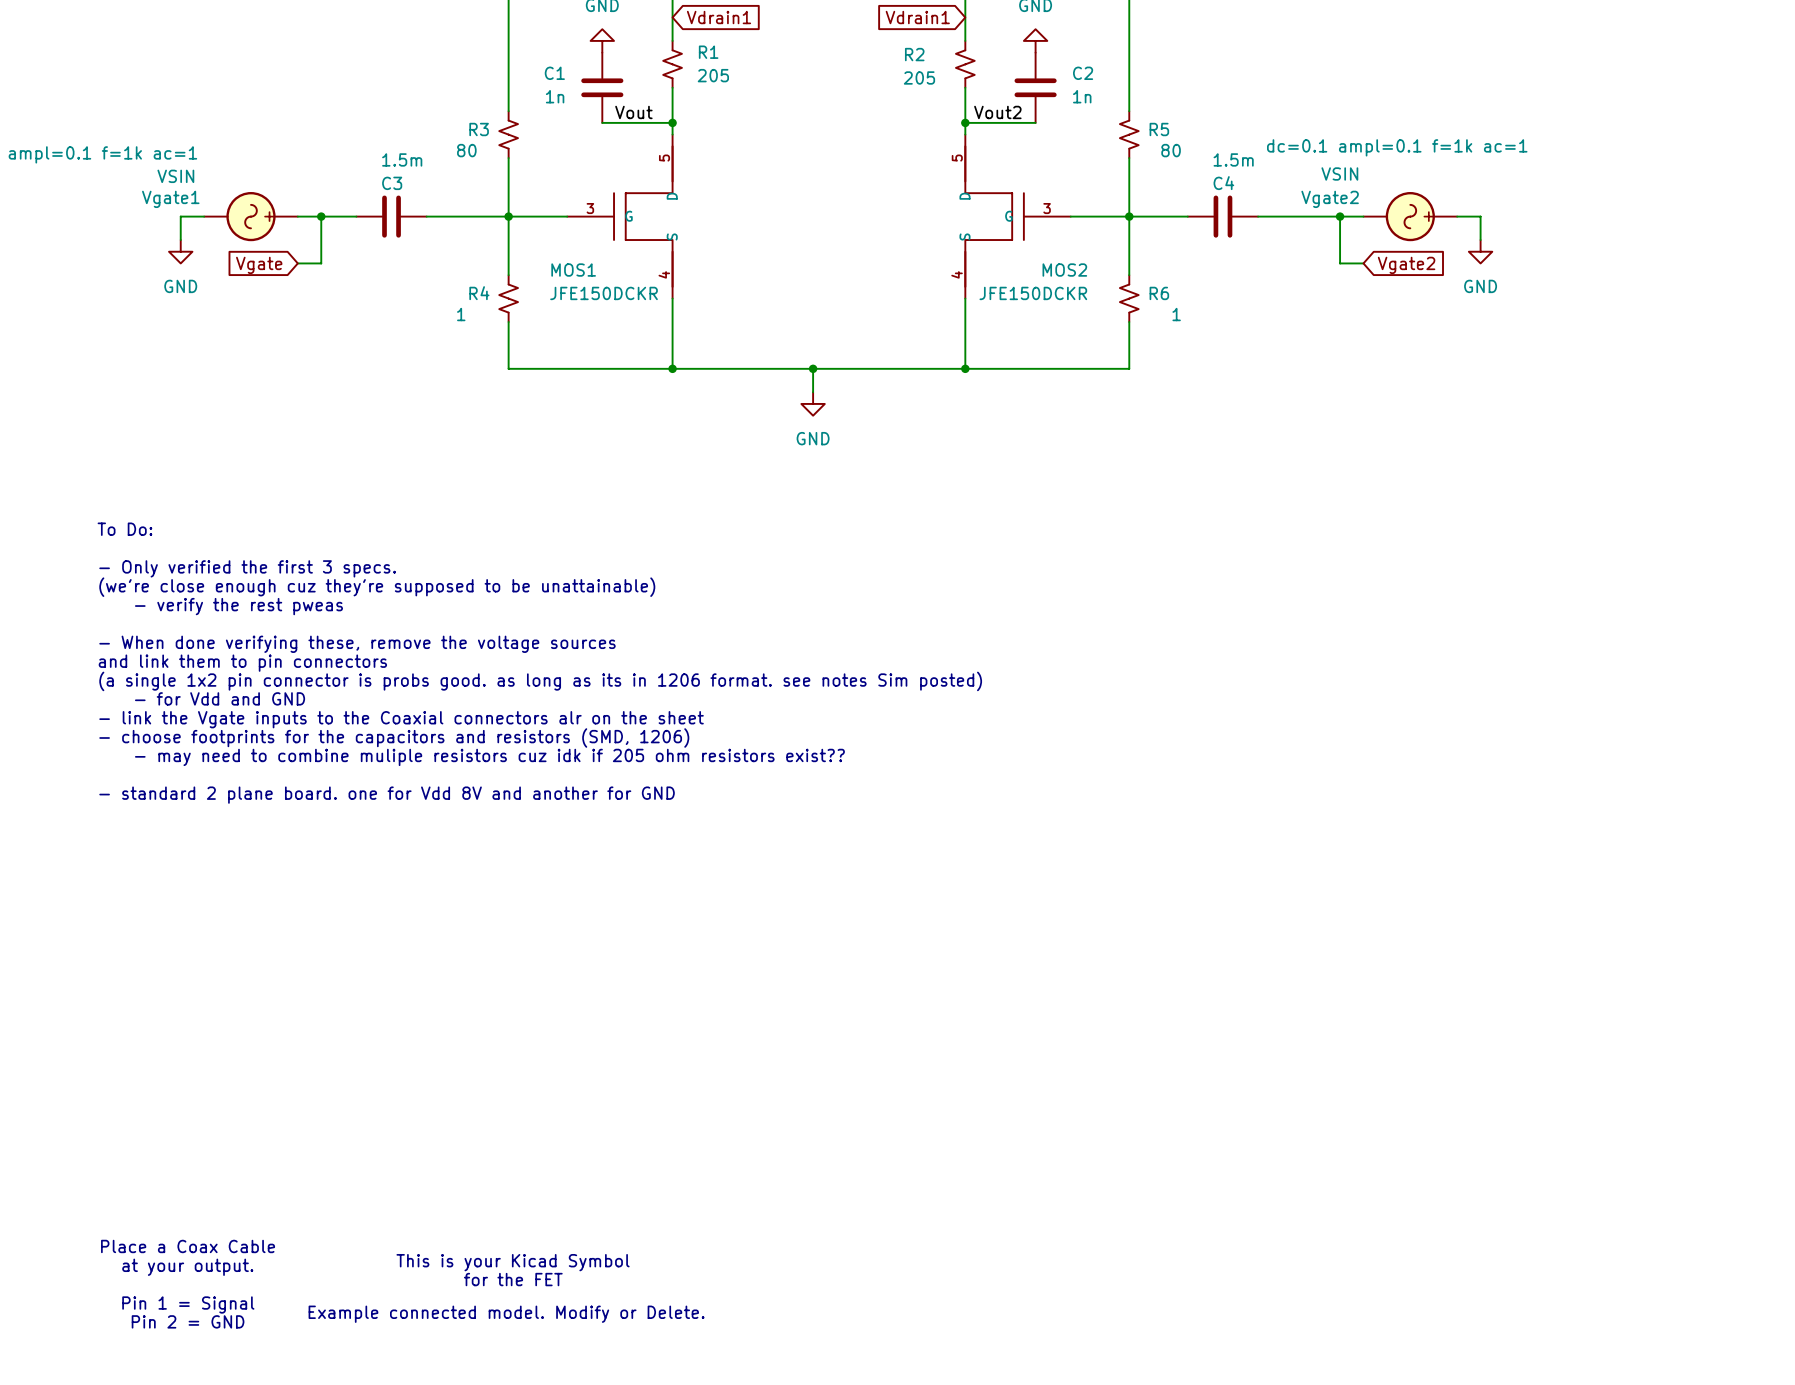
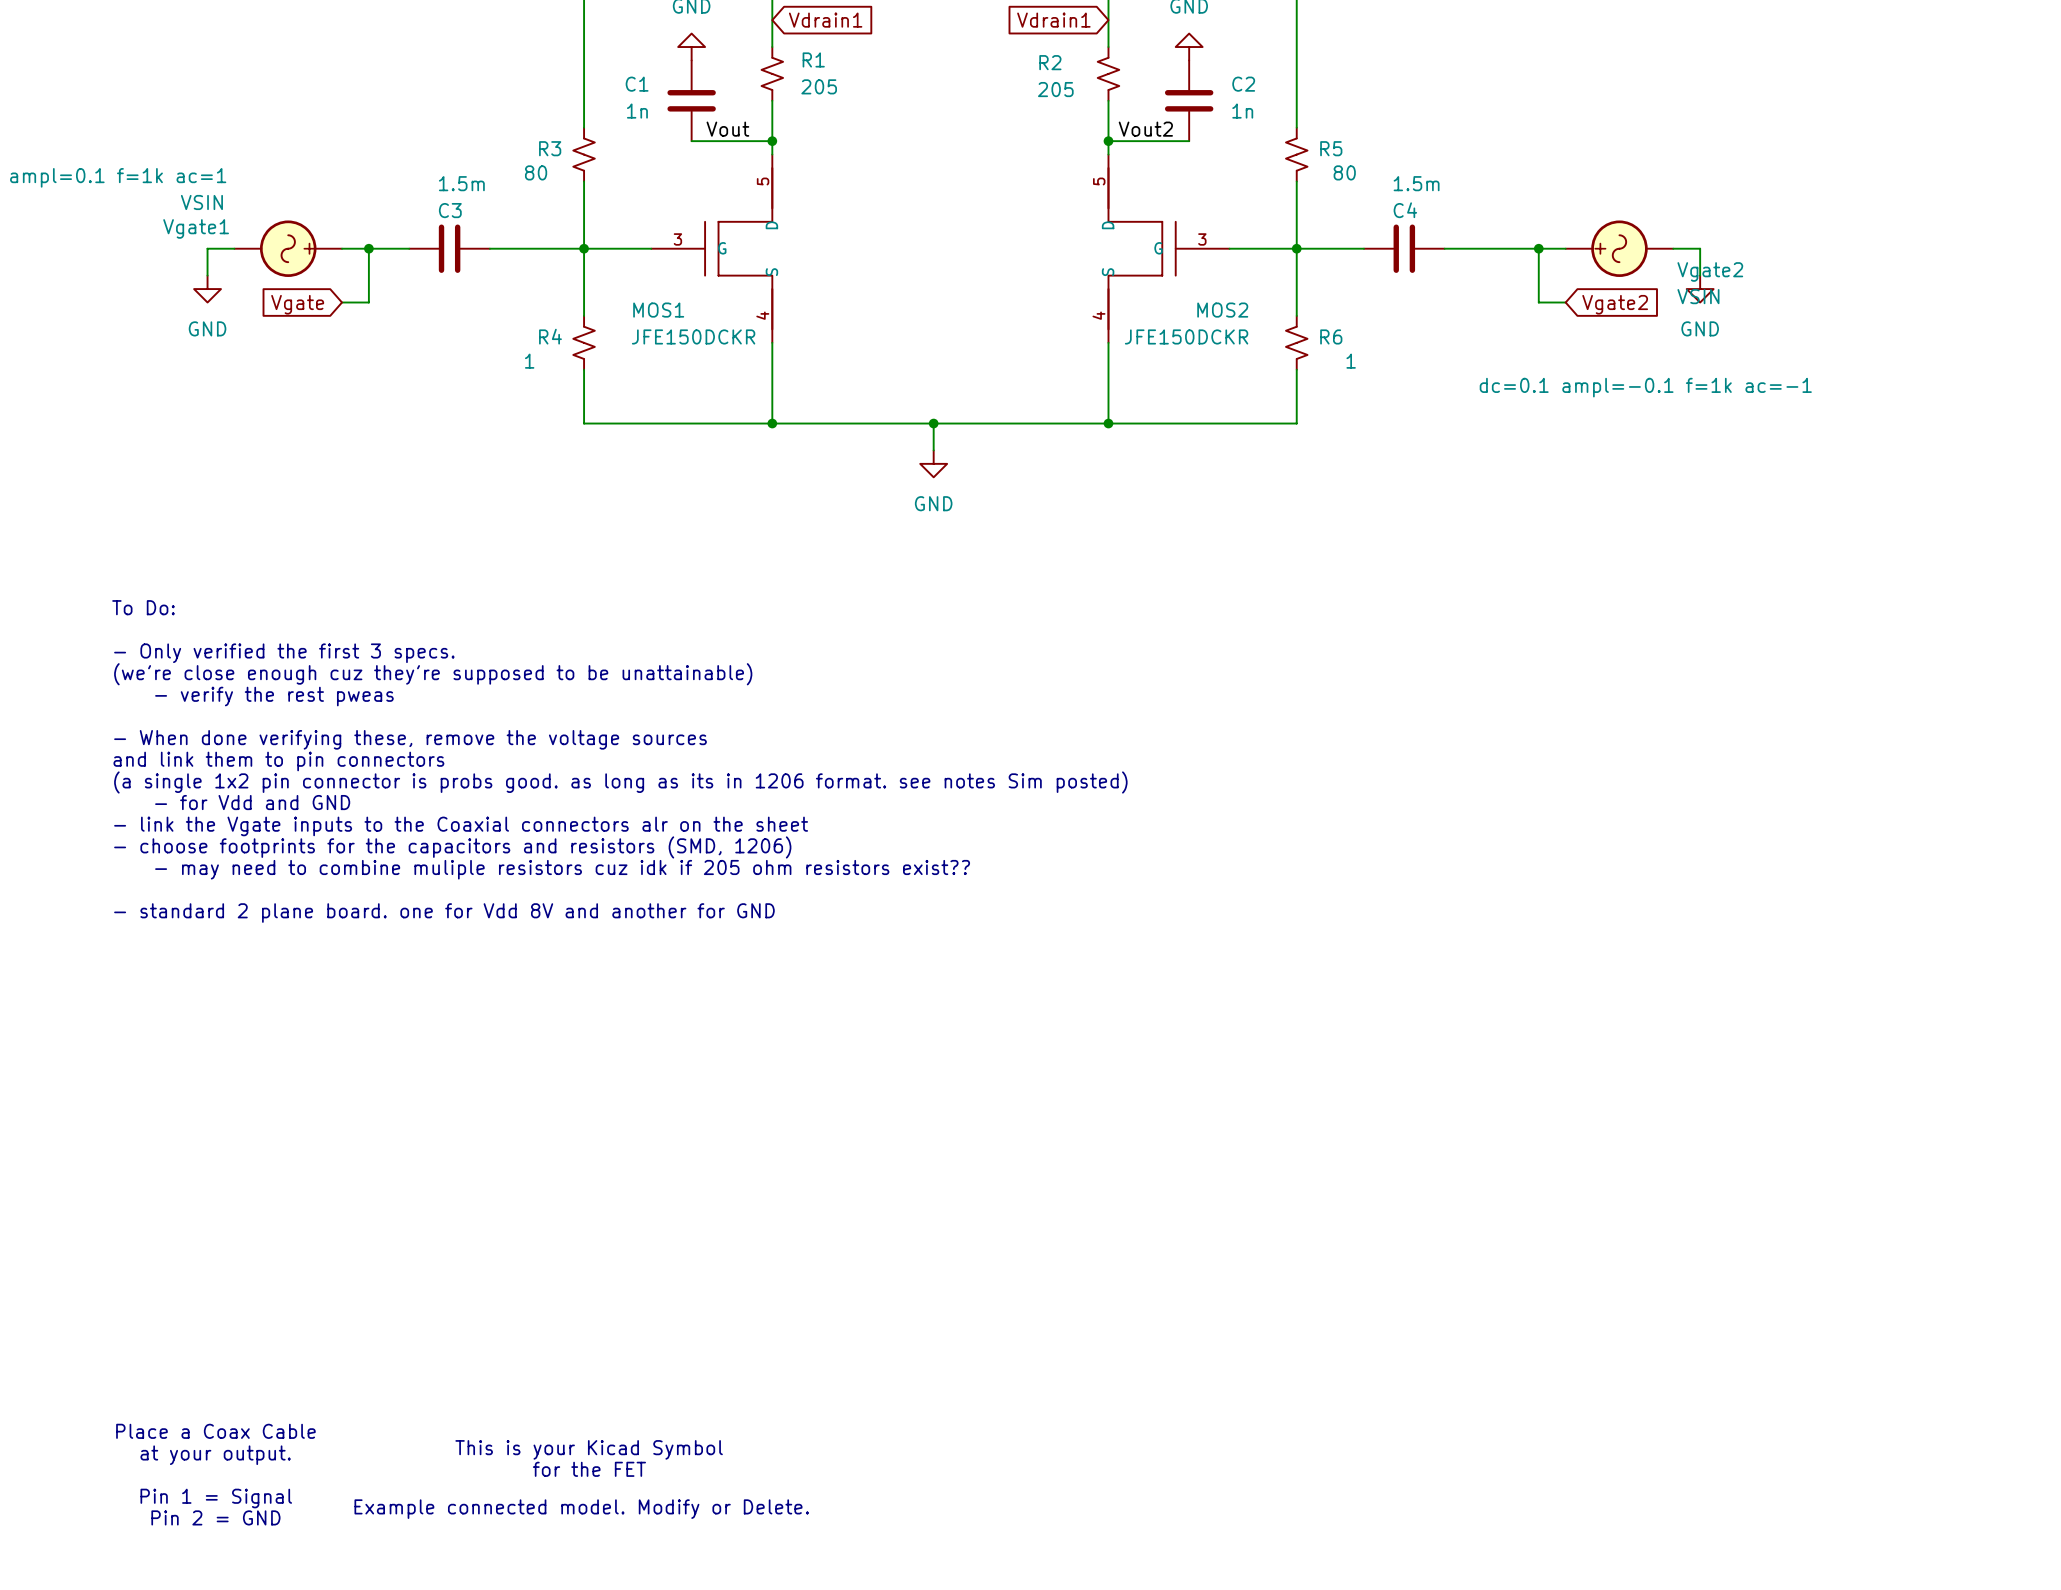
Vgate2 text: dc=0.1 ampl=0.1 f=1k ac=1 (1397, 147) -> dc=0.1 ampl=-0.1 f=1k ac=-1 (1645, 387)
Vgate2 rotation: 0° (1410, 216) -> 180° (1619, 248)

